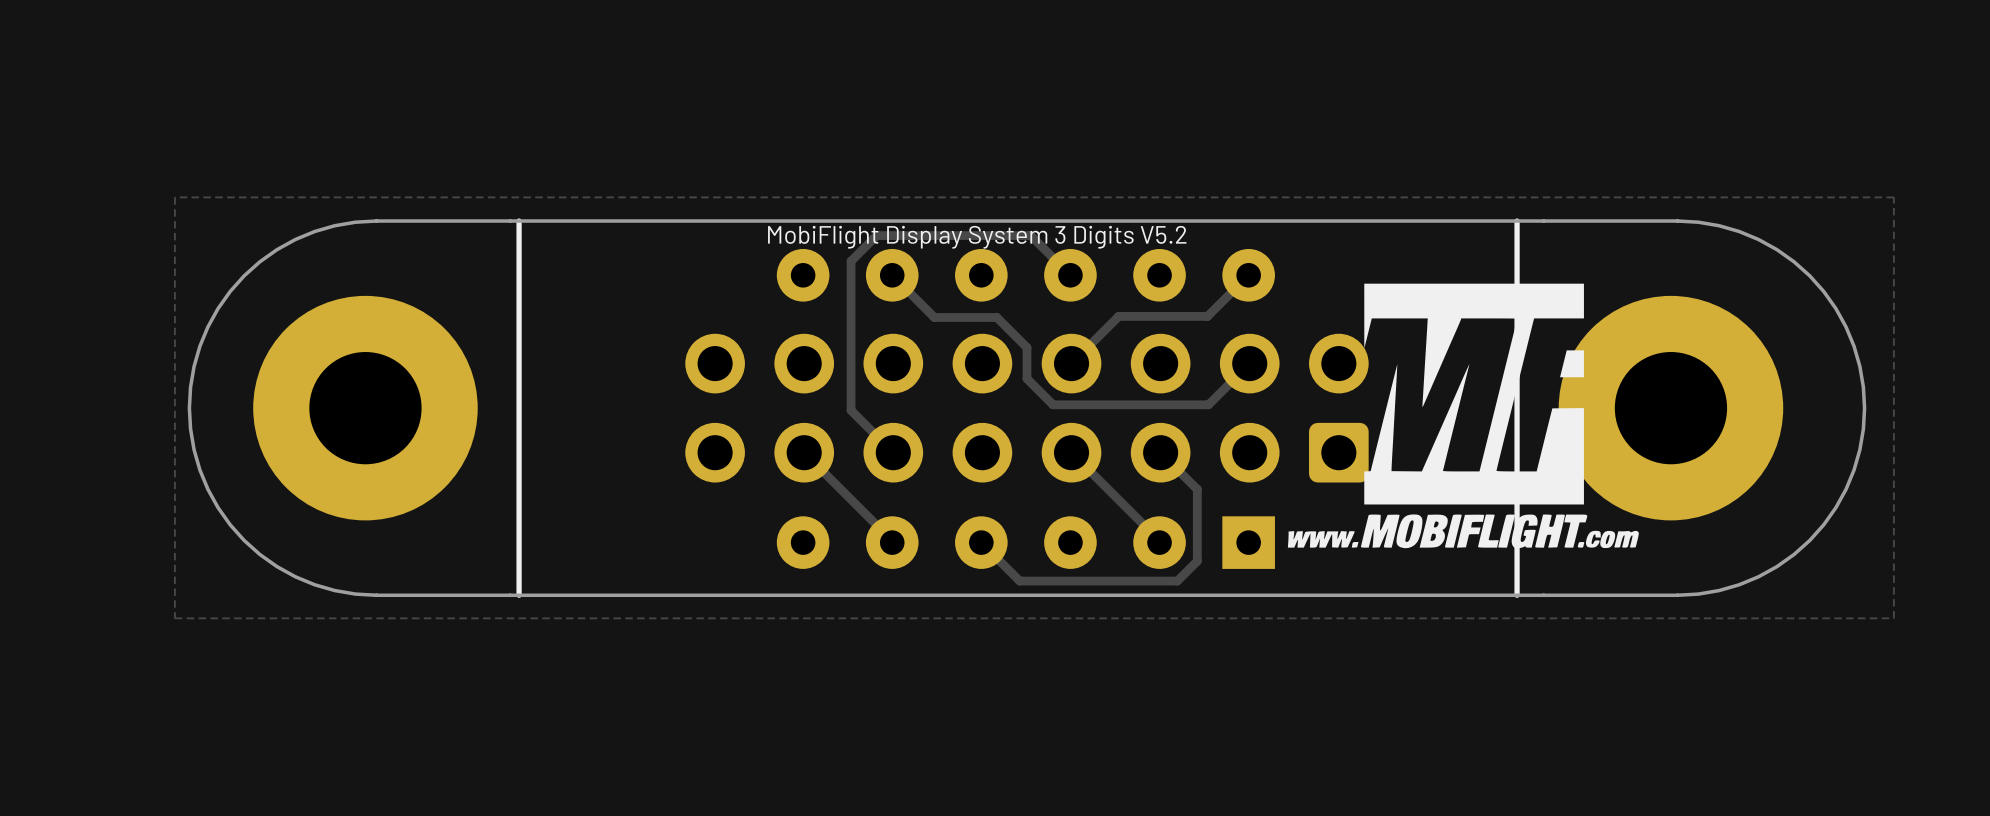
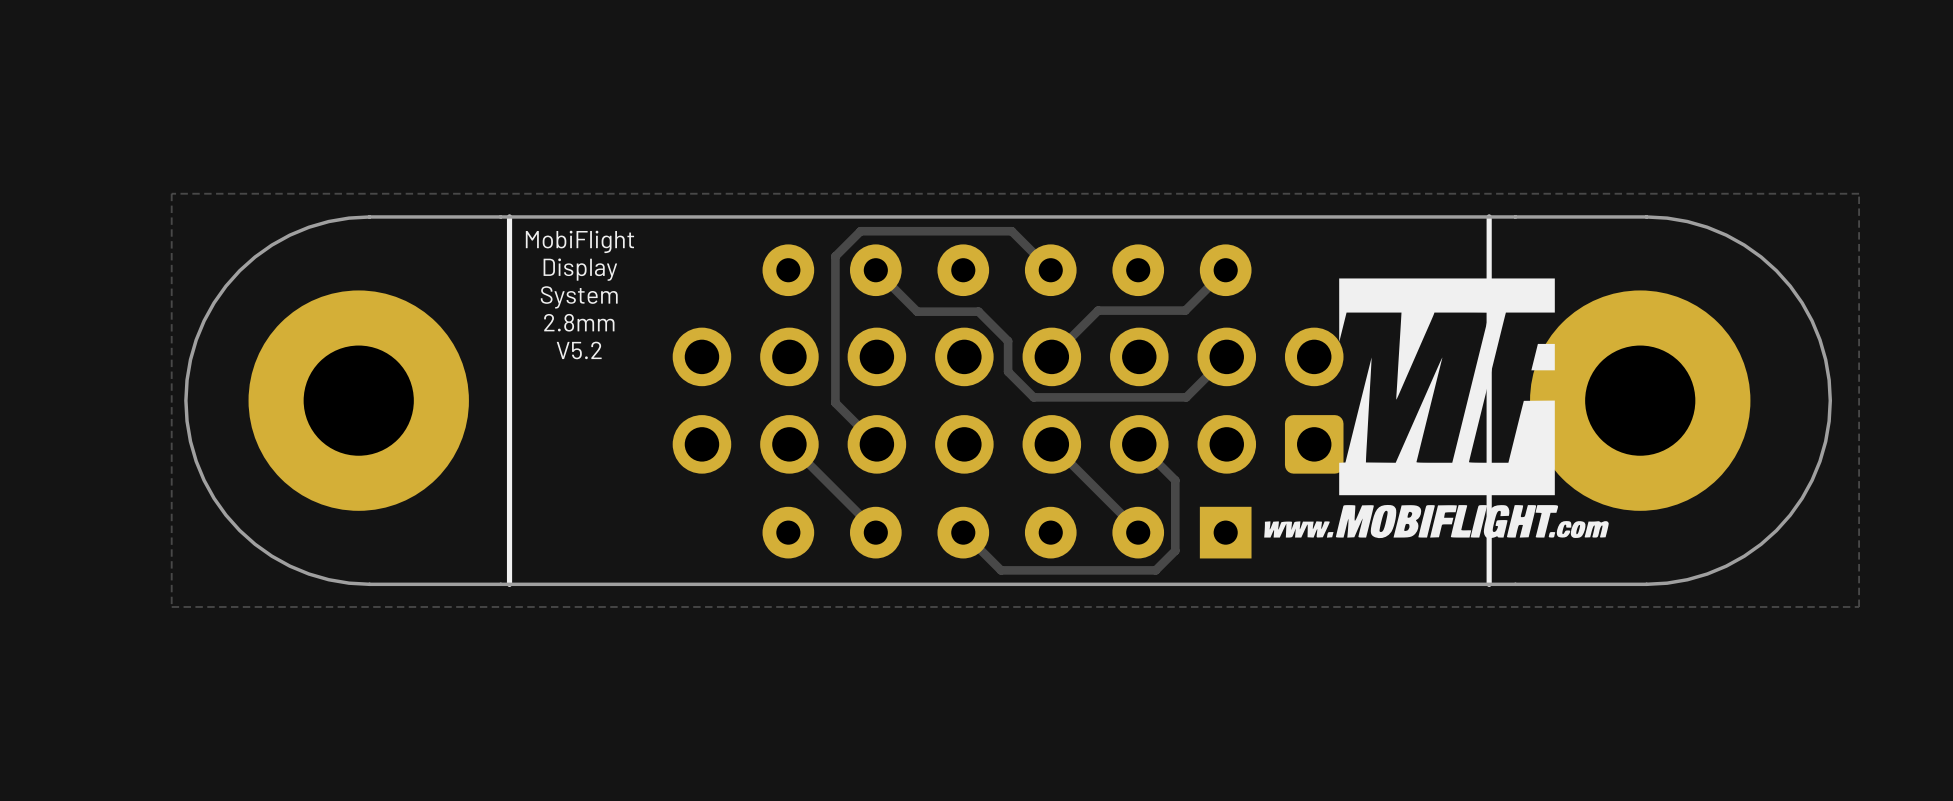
text: MobiFlight Display System 3 Digits V5.2 (977, 237) -> none
text: none -> MobiFlight (579, 241)
text: none -> Display (580, 269)
text: none -> System (579, 297)
text: none -> 2.8mm (579, 322)
text: none -> V5.2 (579, 350)

